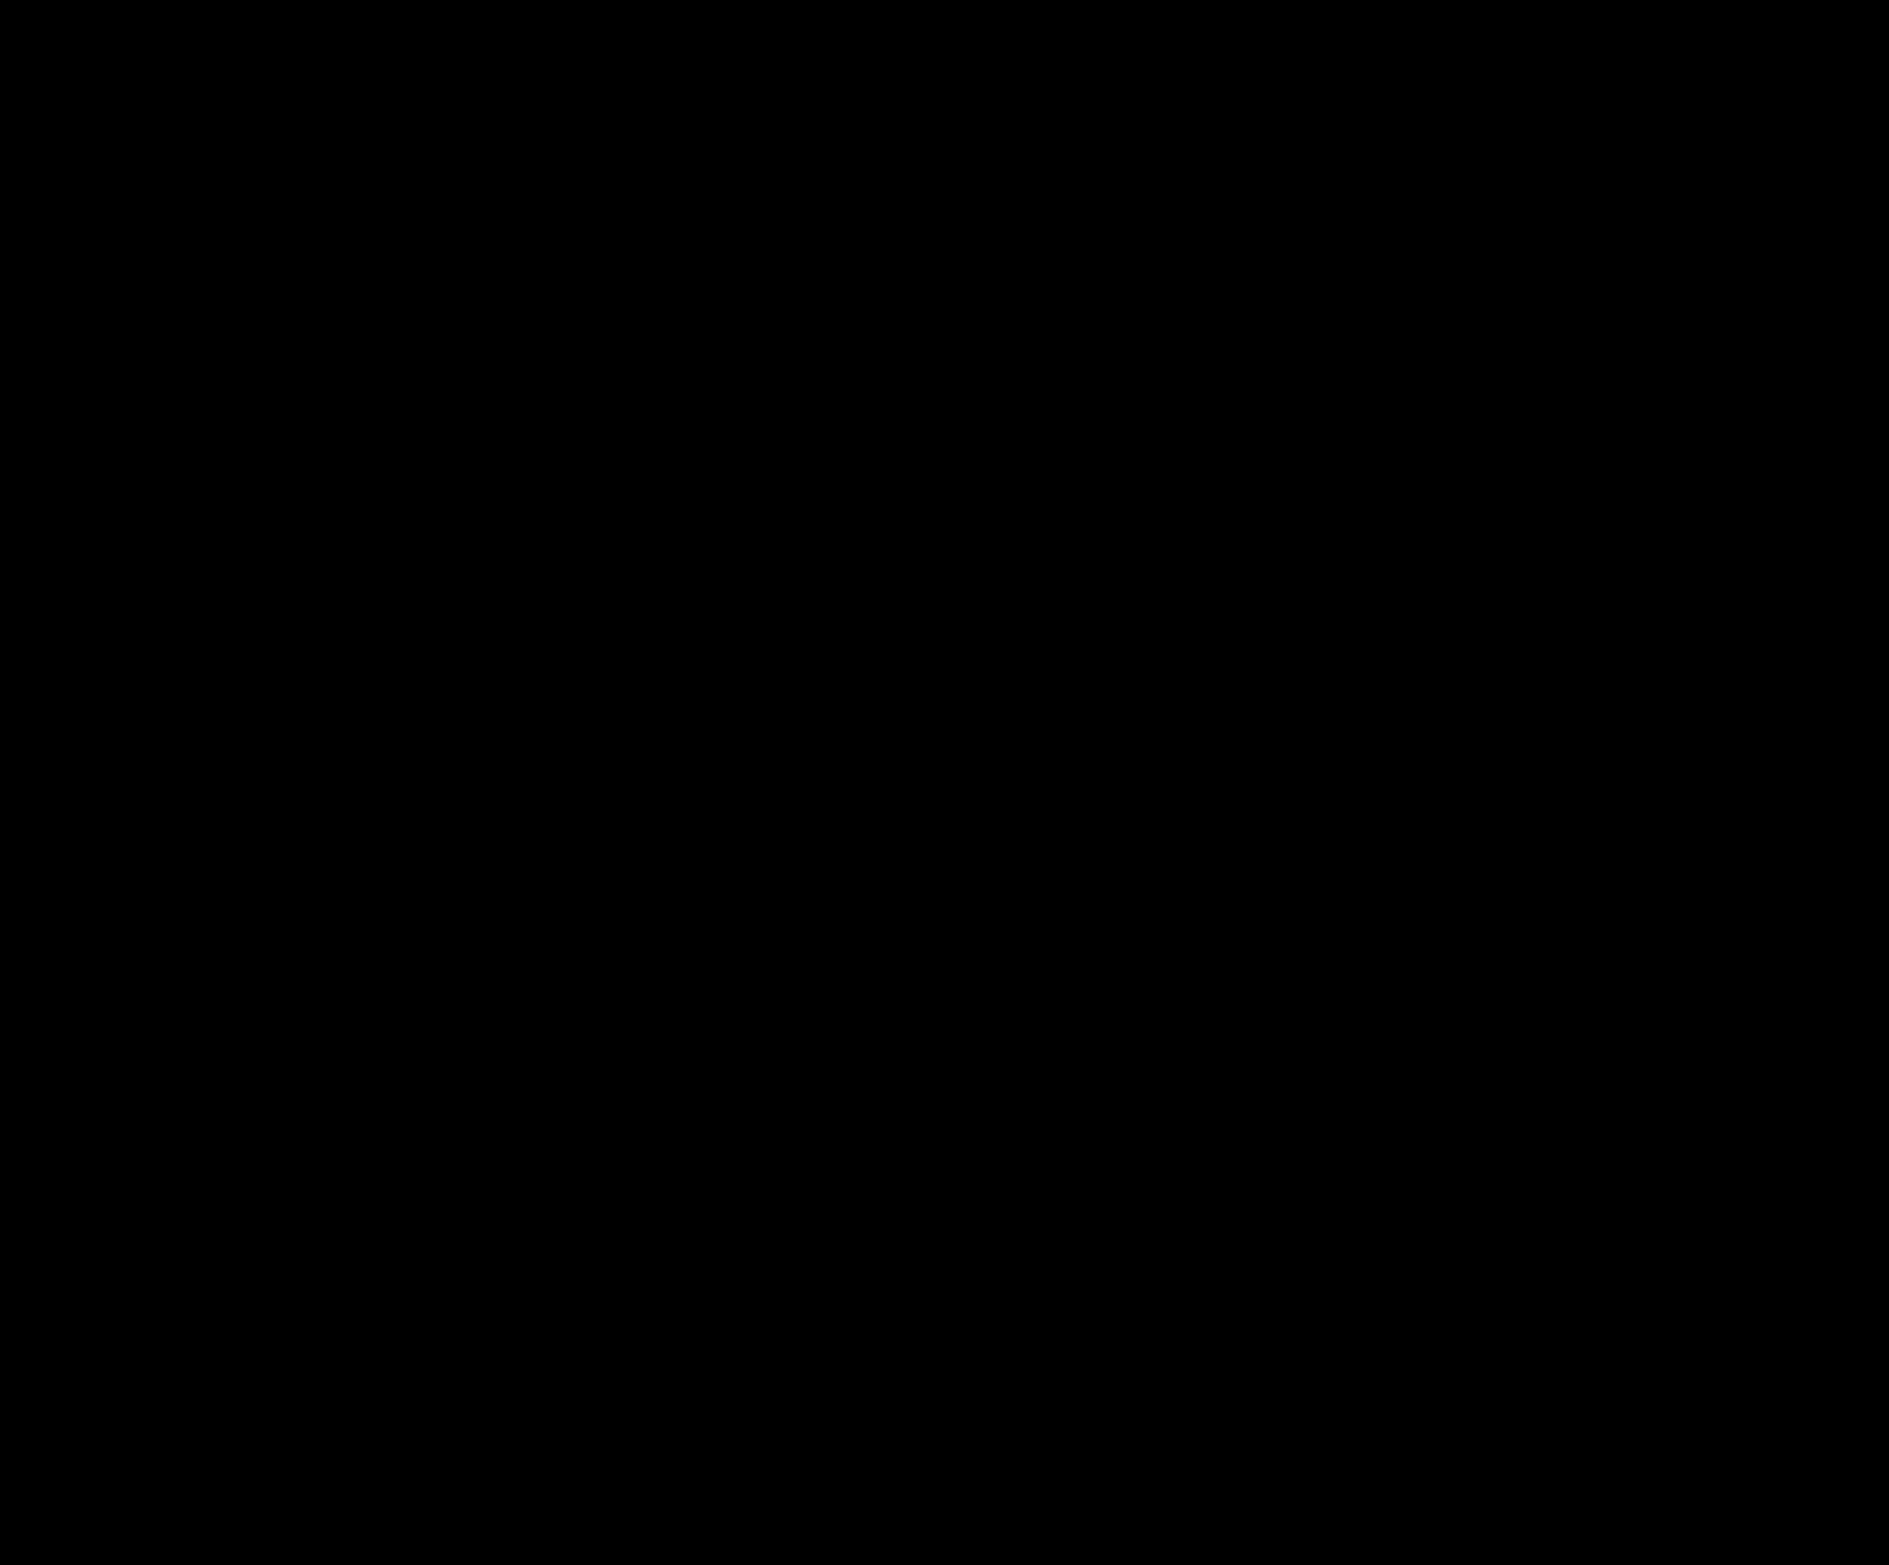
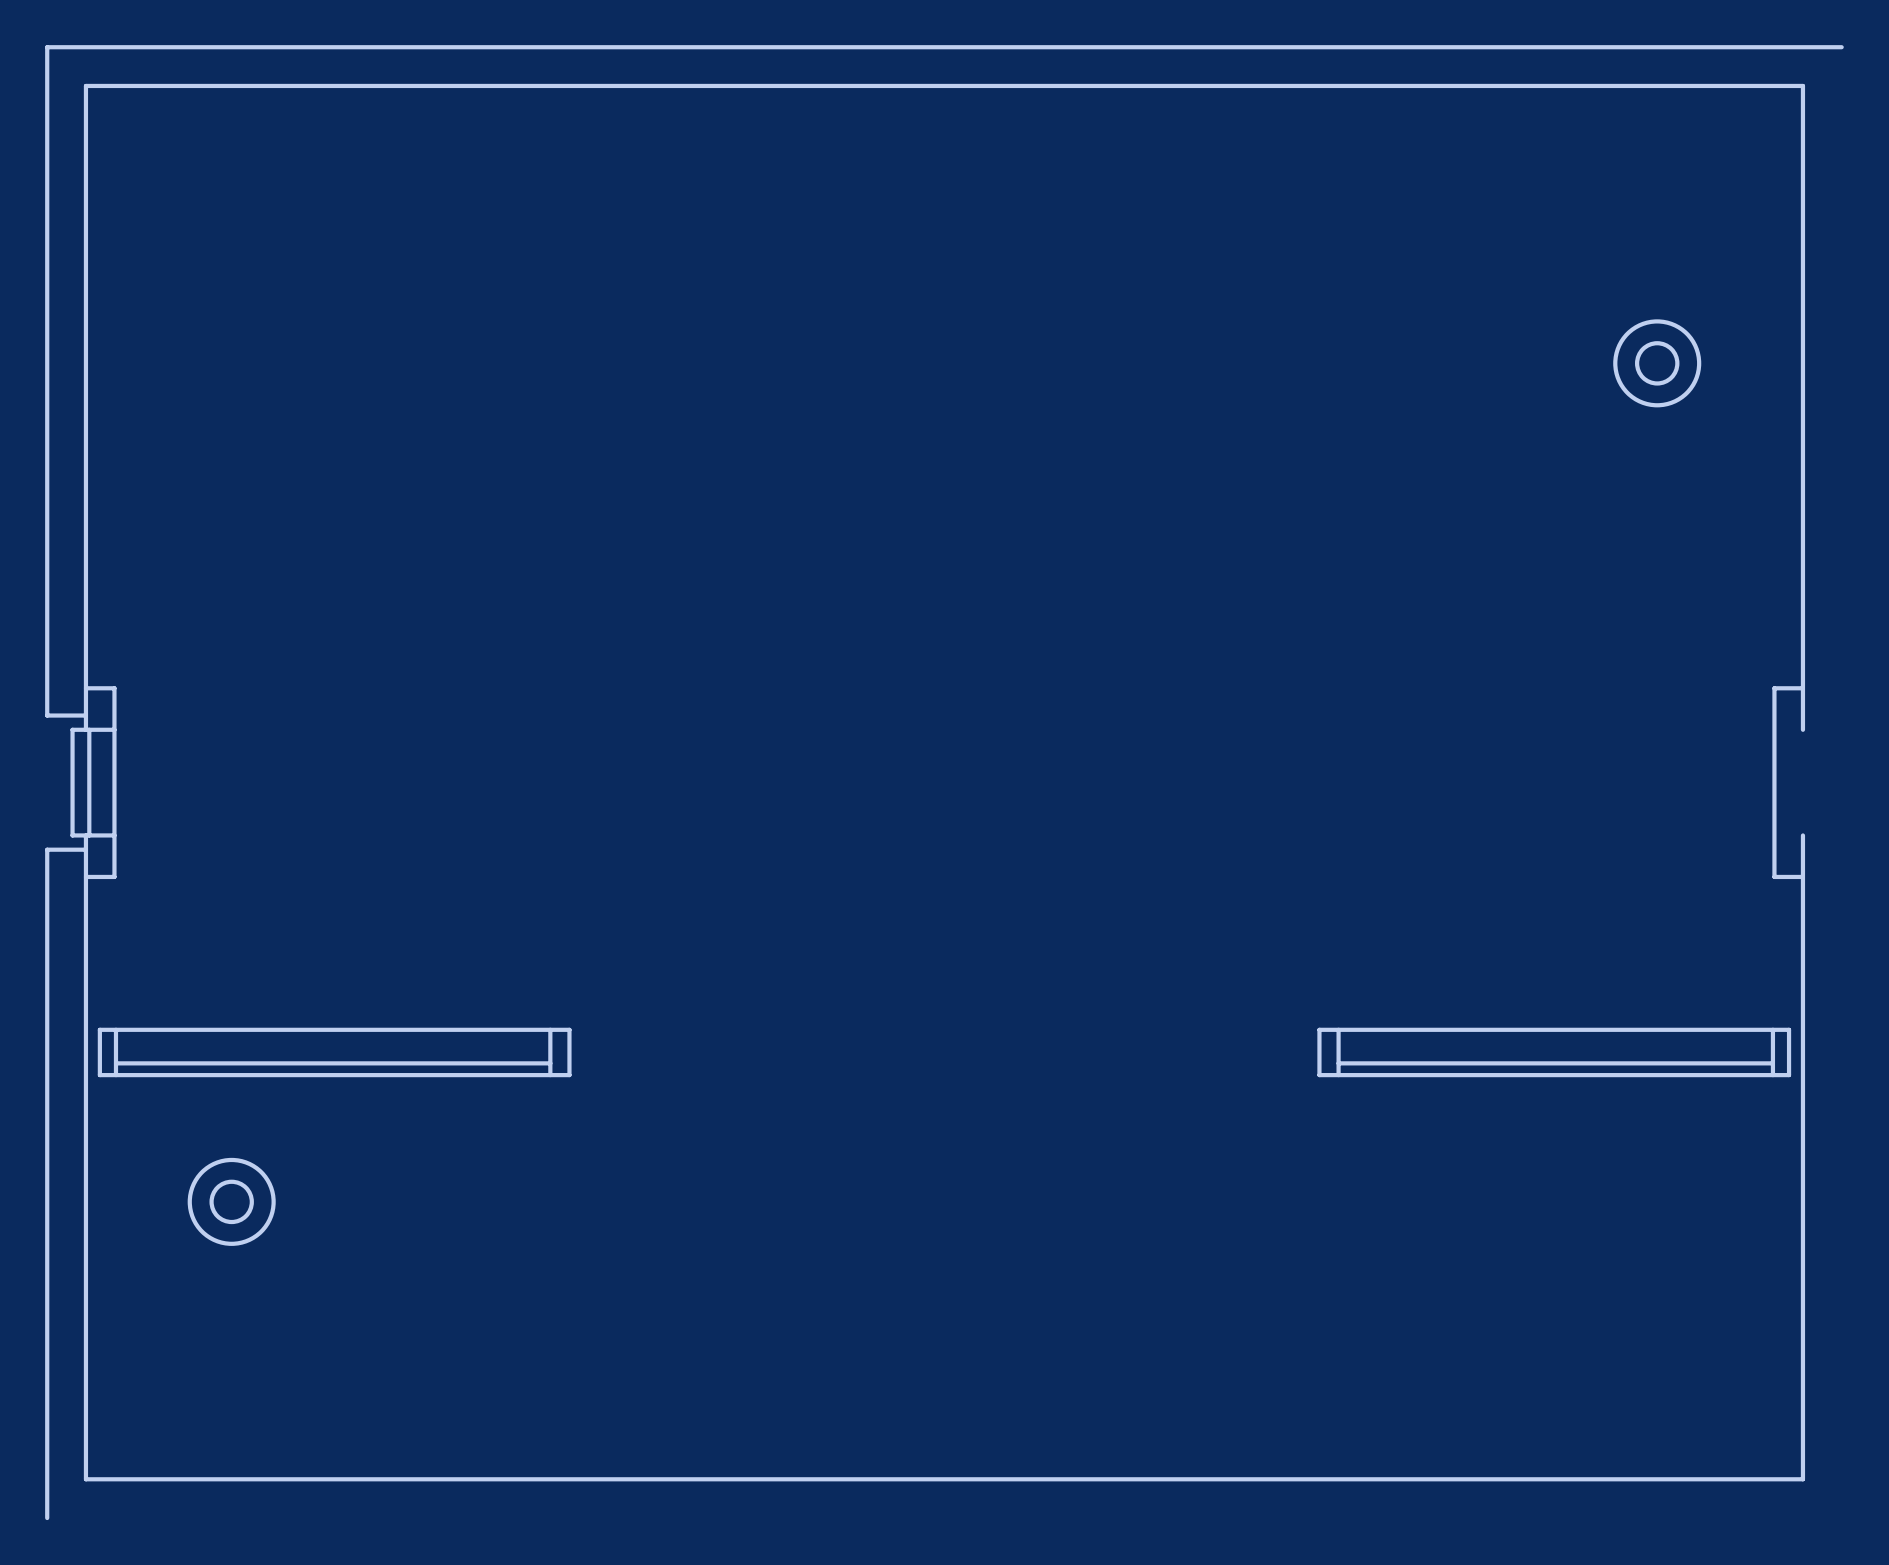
board edge: none -> (1841, 47) (47, 47) (47, 715) (85, 715)
round board edge: none -> [1613, 319, 1702, 408]
round board edge: none -> [1635, 341, 1680, 386]
board edge: none -> (85, 688) (114, 688) (114, 876) (85, 876)
board edge: none -> (1802, 688) (1774, 688) (1774, 876) (1802, 876)
board edge: none -> (85, 729) (85, 85) (1802, 85) (1802, 729)
board edge: none -> (89, 729) (89, 835)
board edge: none -> (114, 729) (72, 729) (72, 835) (114, 835)
board edge: none -> (85, 835) (85, 1479) (1802, 1479) (1802, 835)
board edge: none -> (85, 849) (47, 849) (47, 1518)
board edge: none -> (99, 1029) (569, 1029) (569, 1075) (99, 1075) (99, 1029)
board edge: none -> (115, 1029) (115, 1075)
board edge: none -> (550, 1029) (550, 1075)
board edge: none -> (1319, 1029) (1789, 1029) (1789, 1075) (1319, 1075) (1319, 1029)
board edge: none -> (1338, 1029) (1338, 1075)
board edge: none -> (1772, 1029) (1772, 1075)
board edge: none -> (115, 1063) (550, 1063)
board edge: none -> (1338, 1063) (1772, 1063)
round board edge: none -> [187, 1157, 276, 1246]
round board edge: none -> [209, 1179, 254, 1225]

